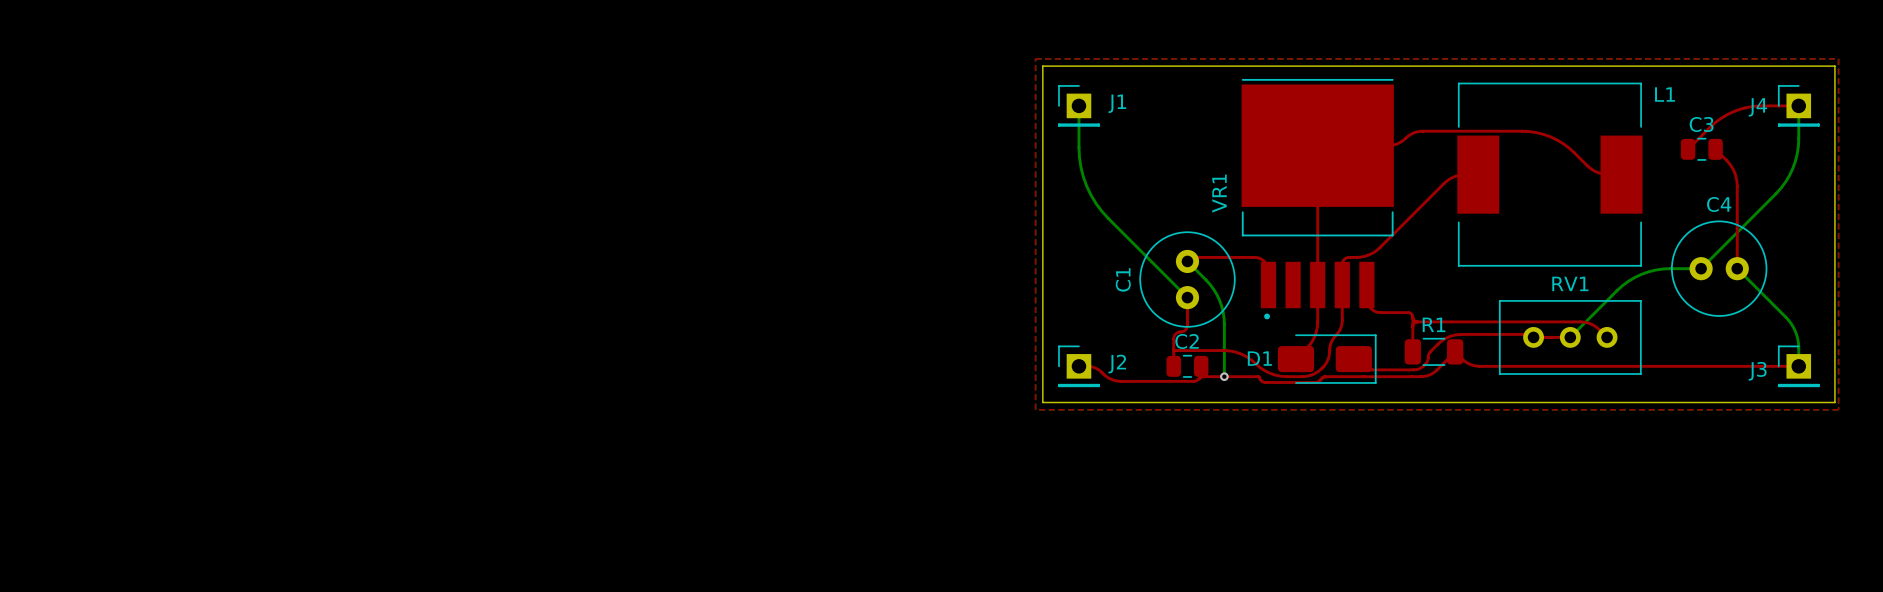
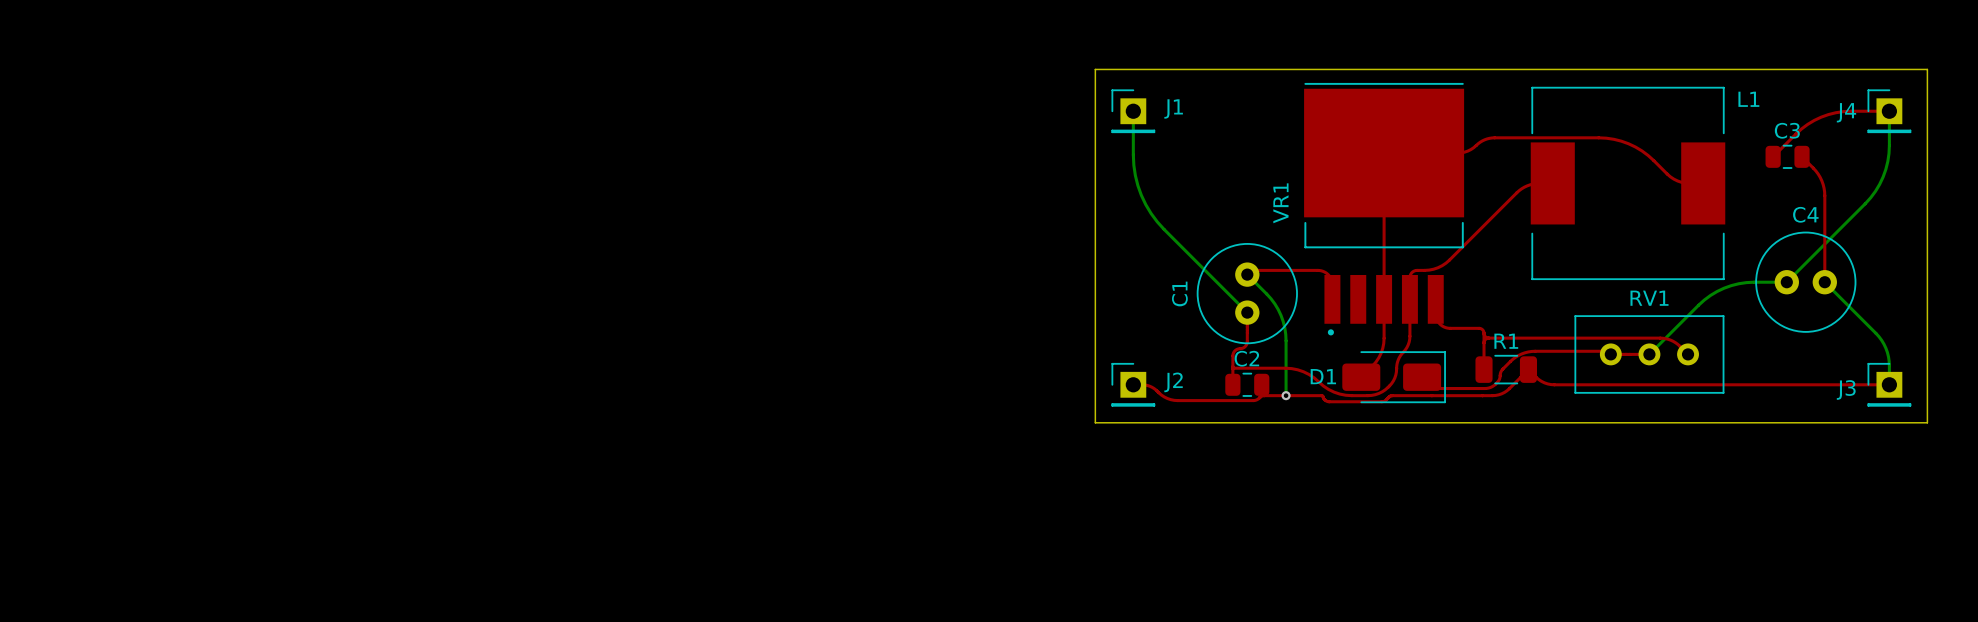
top zone outline: (1035, 58) (1838, 58) (1838, 409) (1035, 409) (1035, 58) -> none

